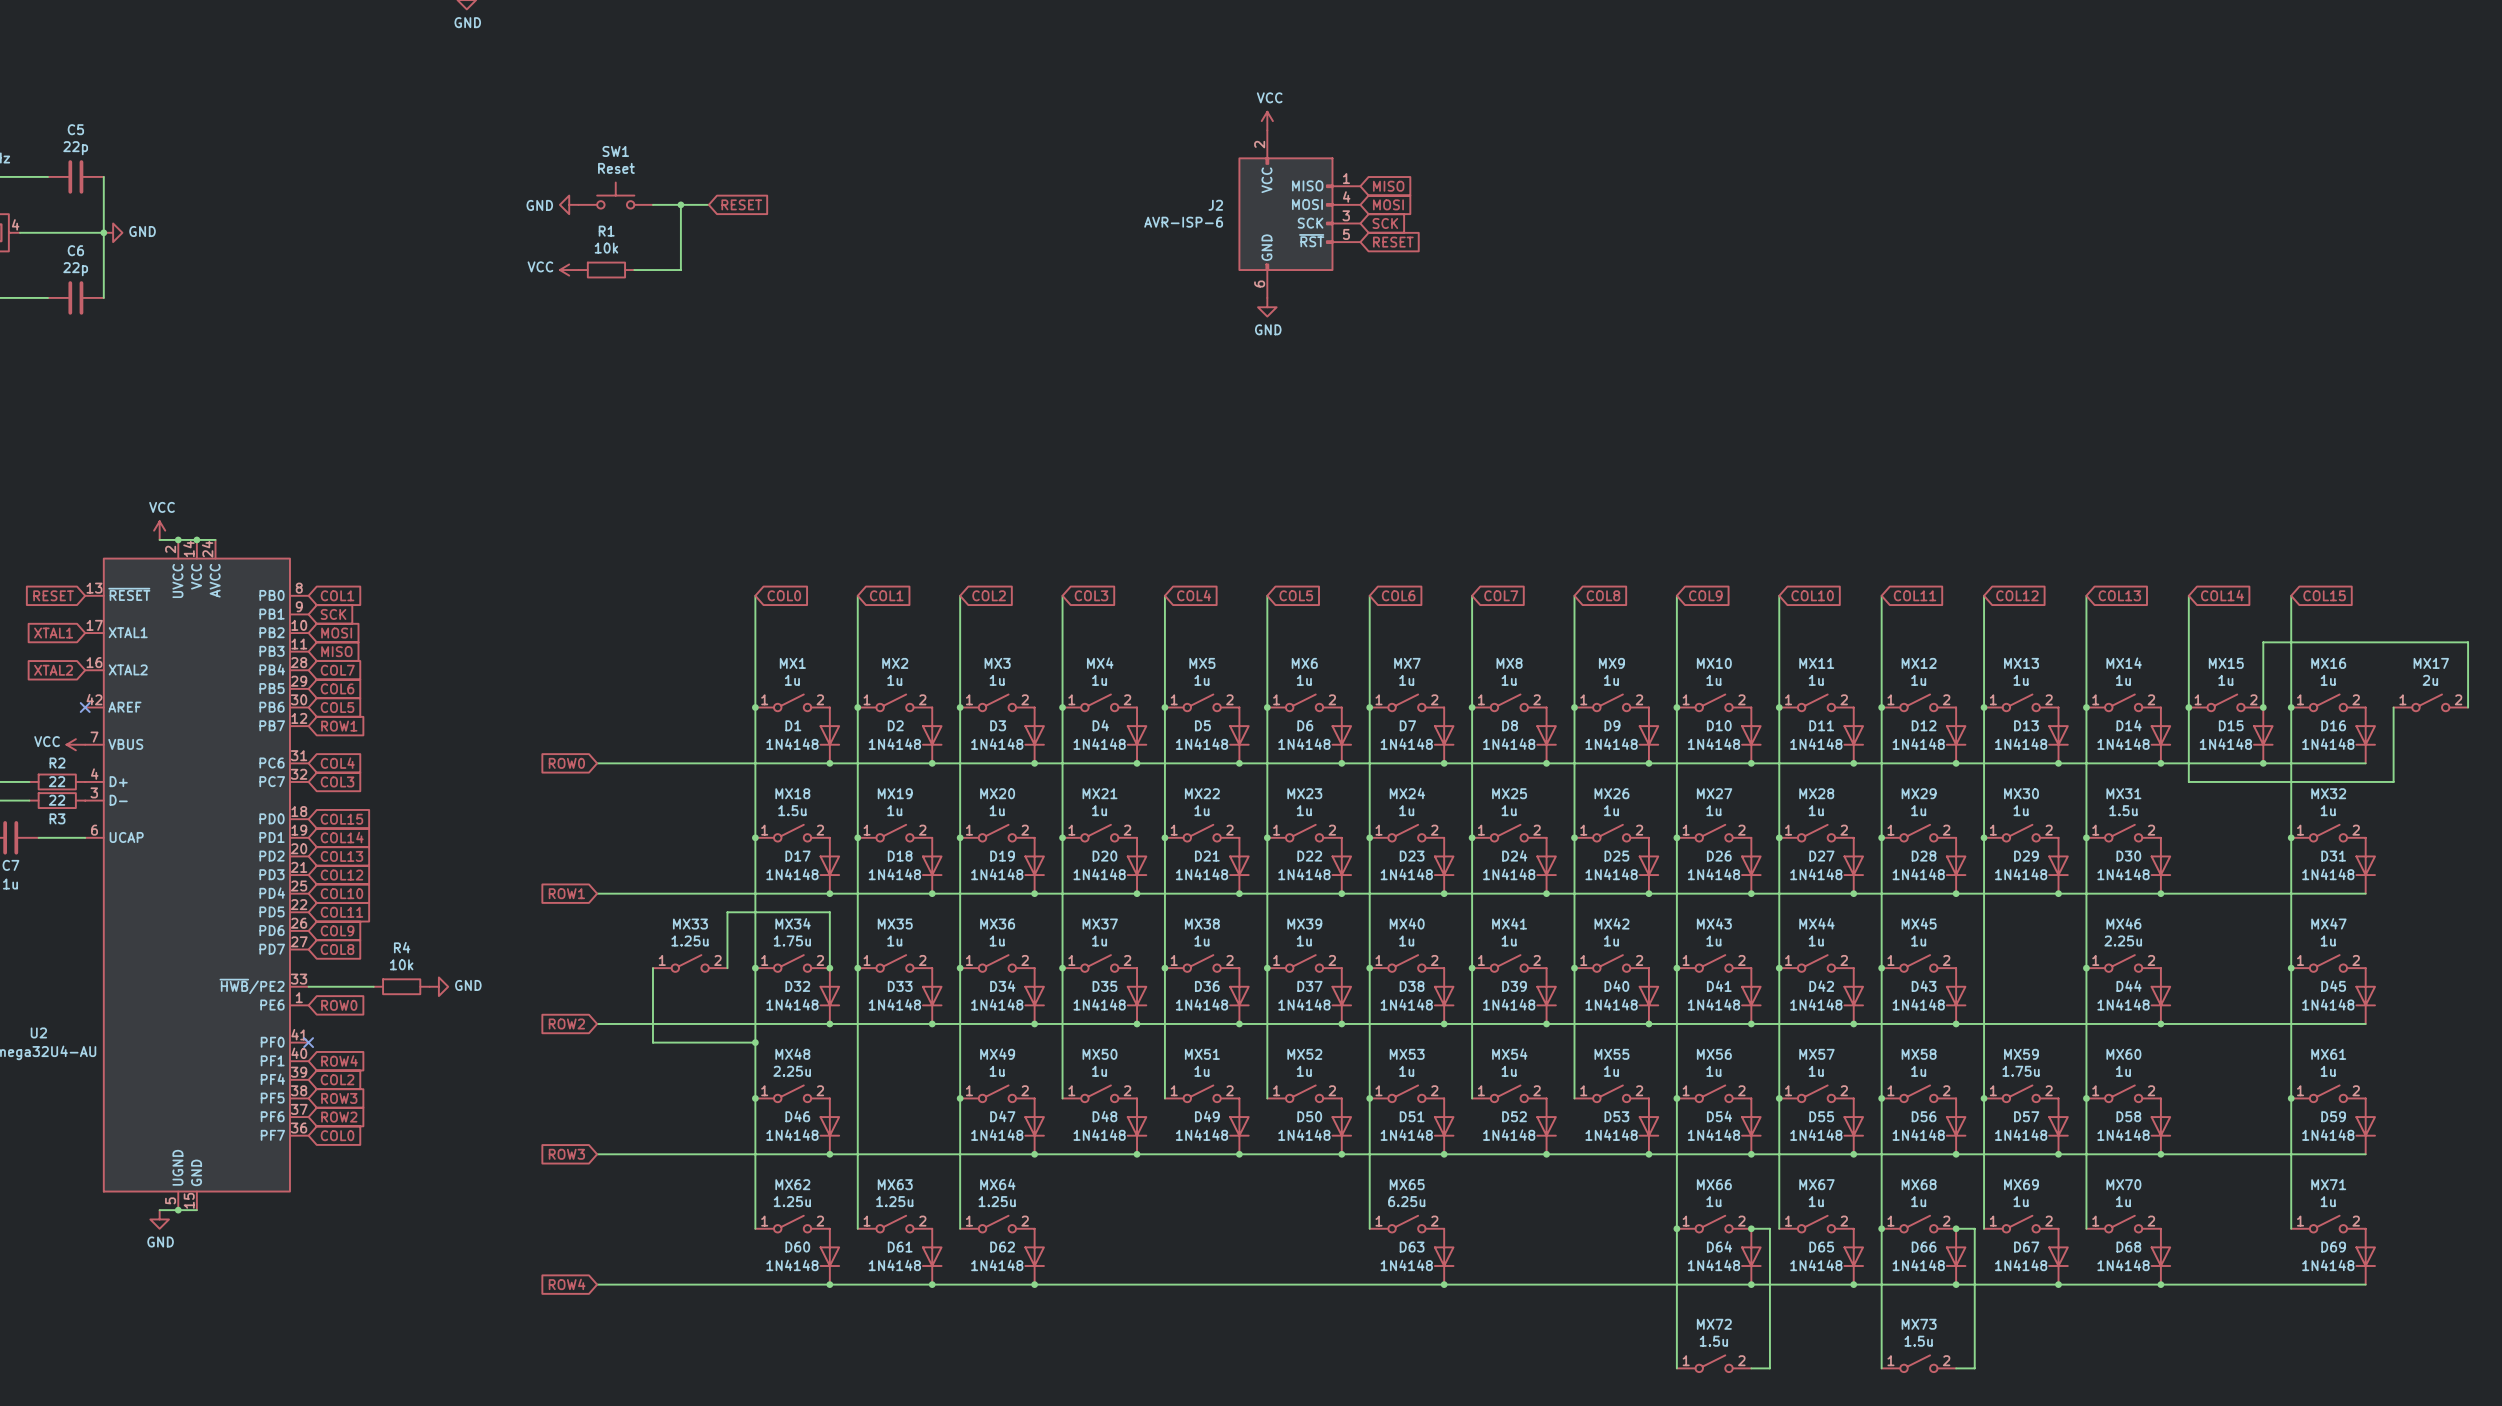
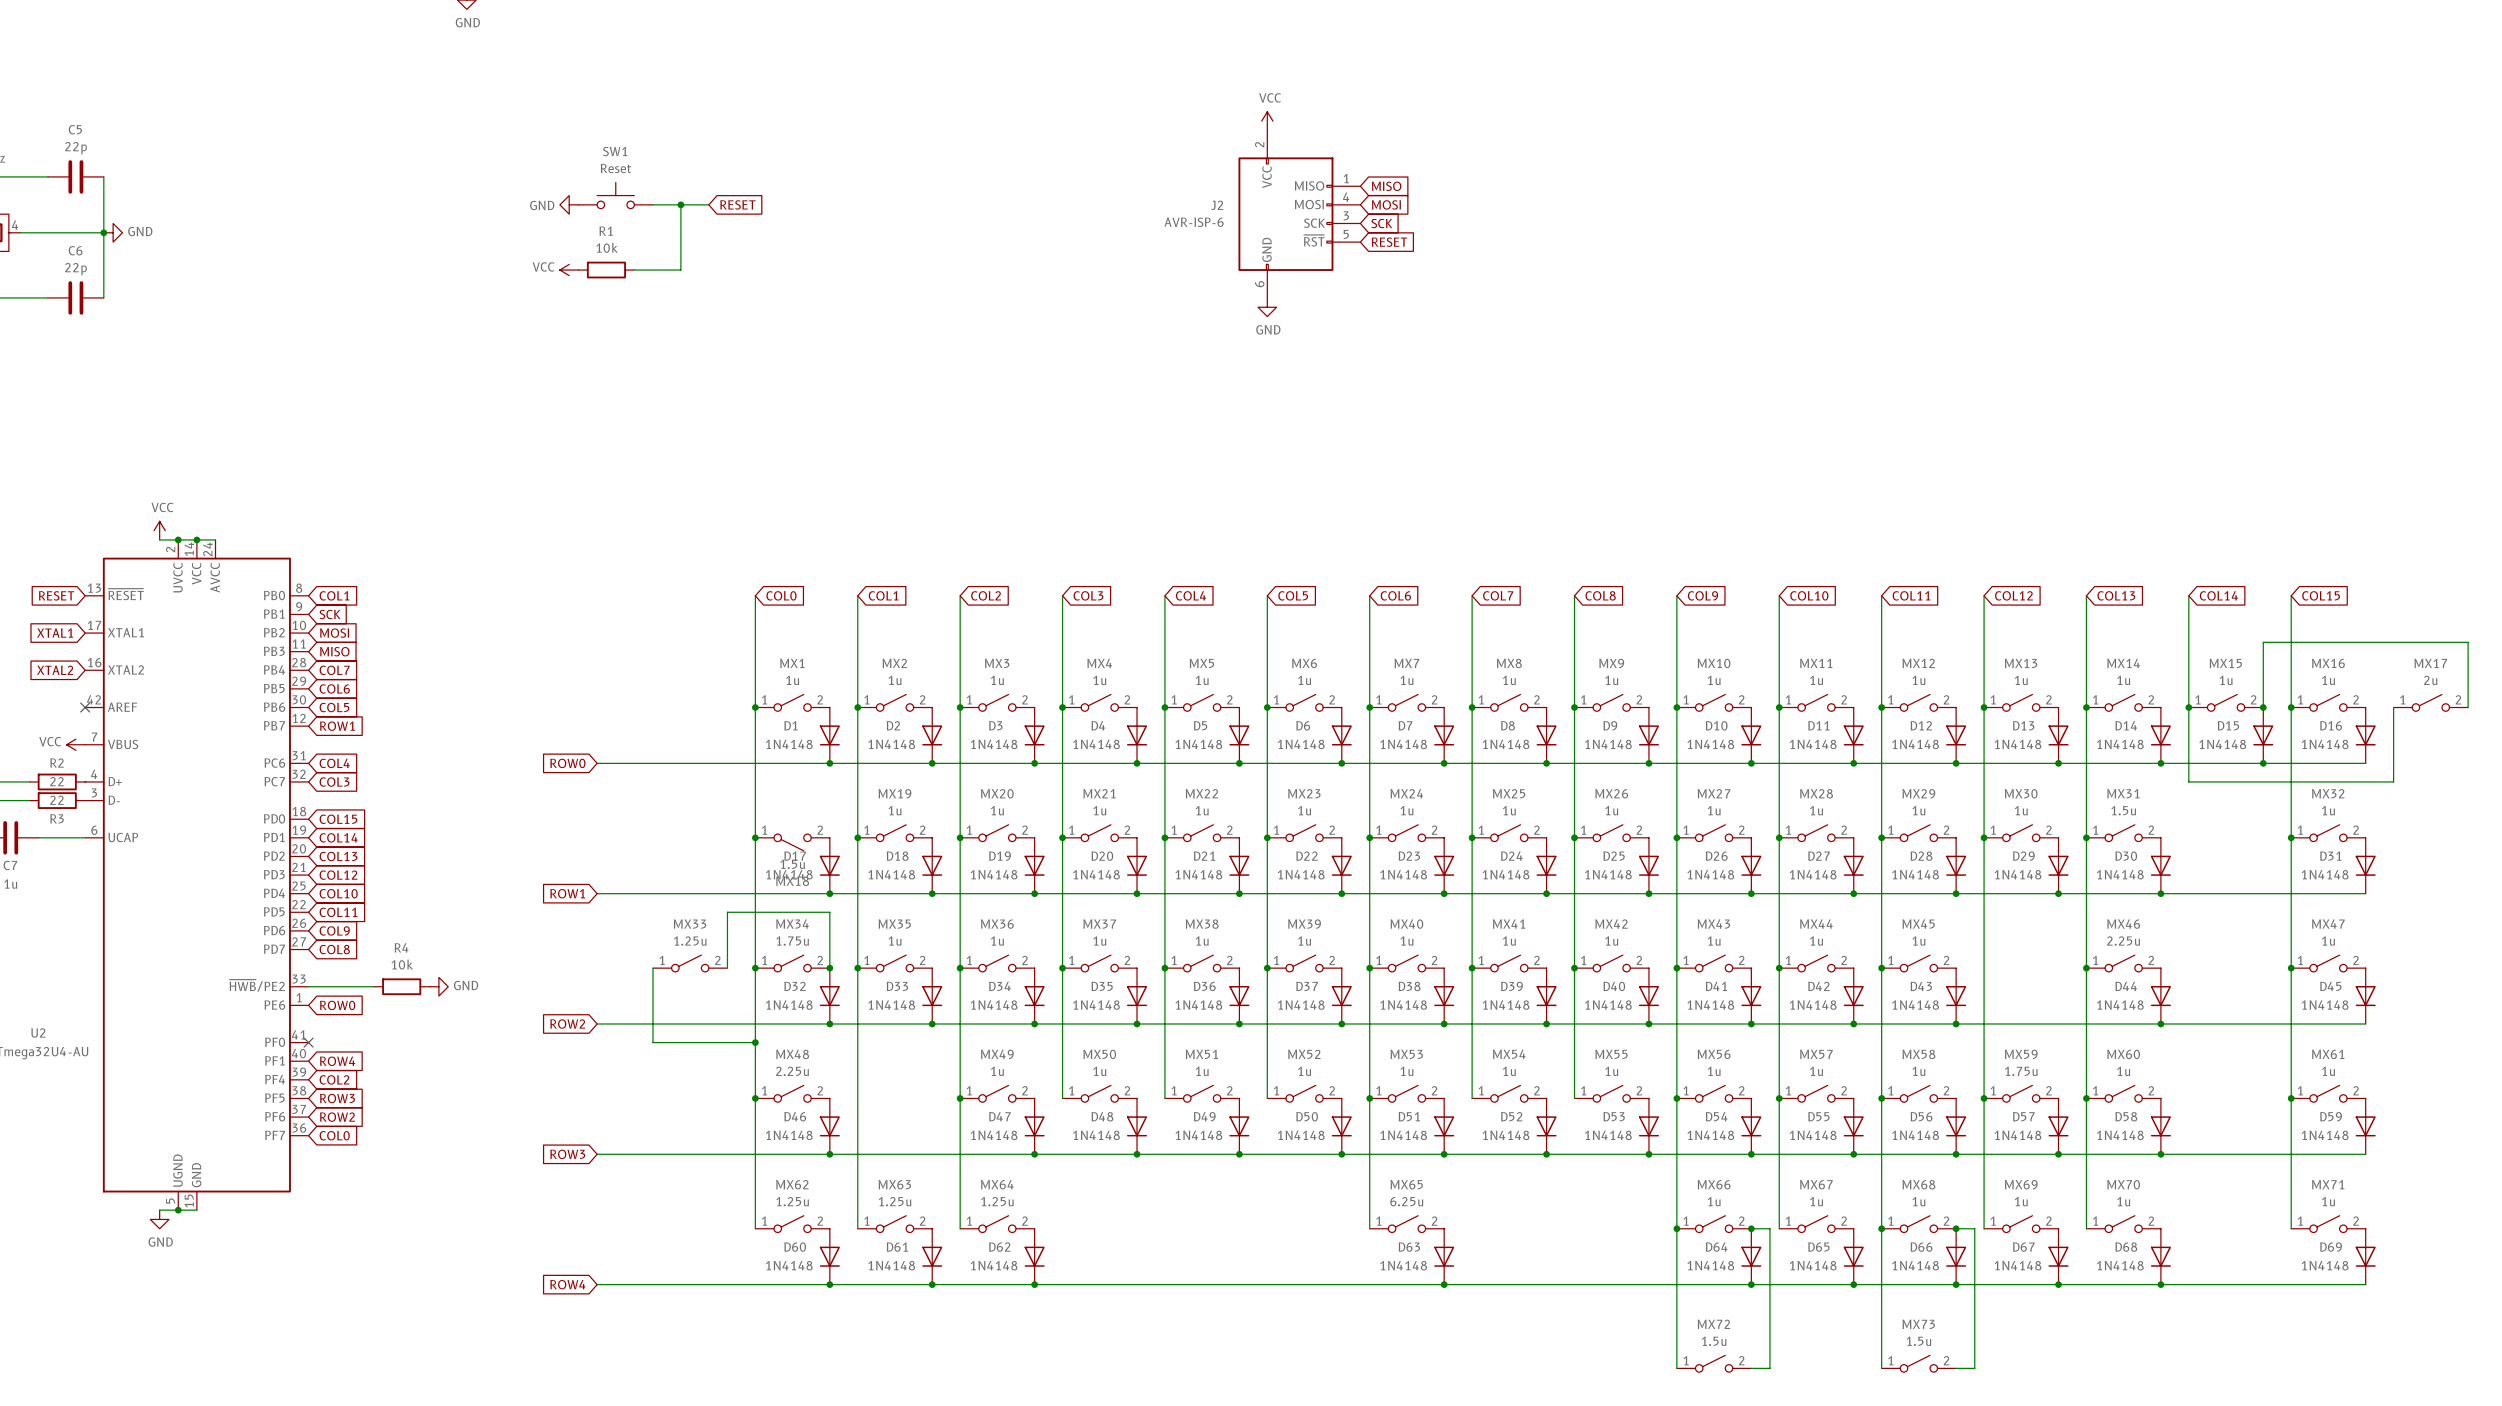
MX18 flip: as is (792, 833) -> up-down (792, 842)

